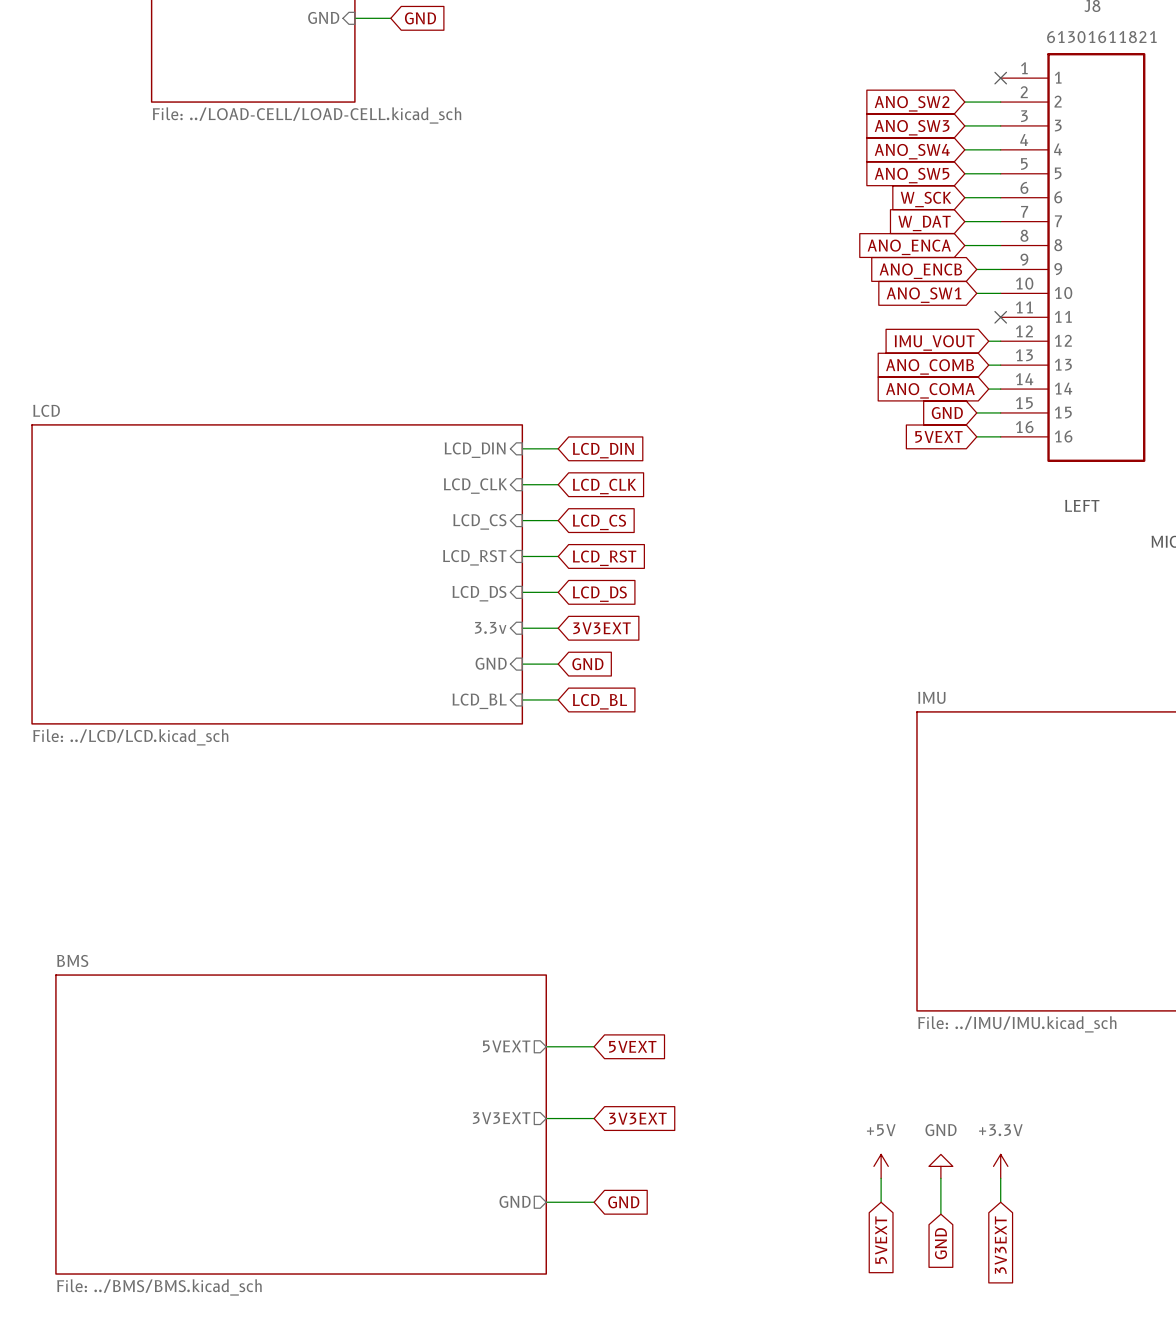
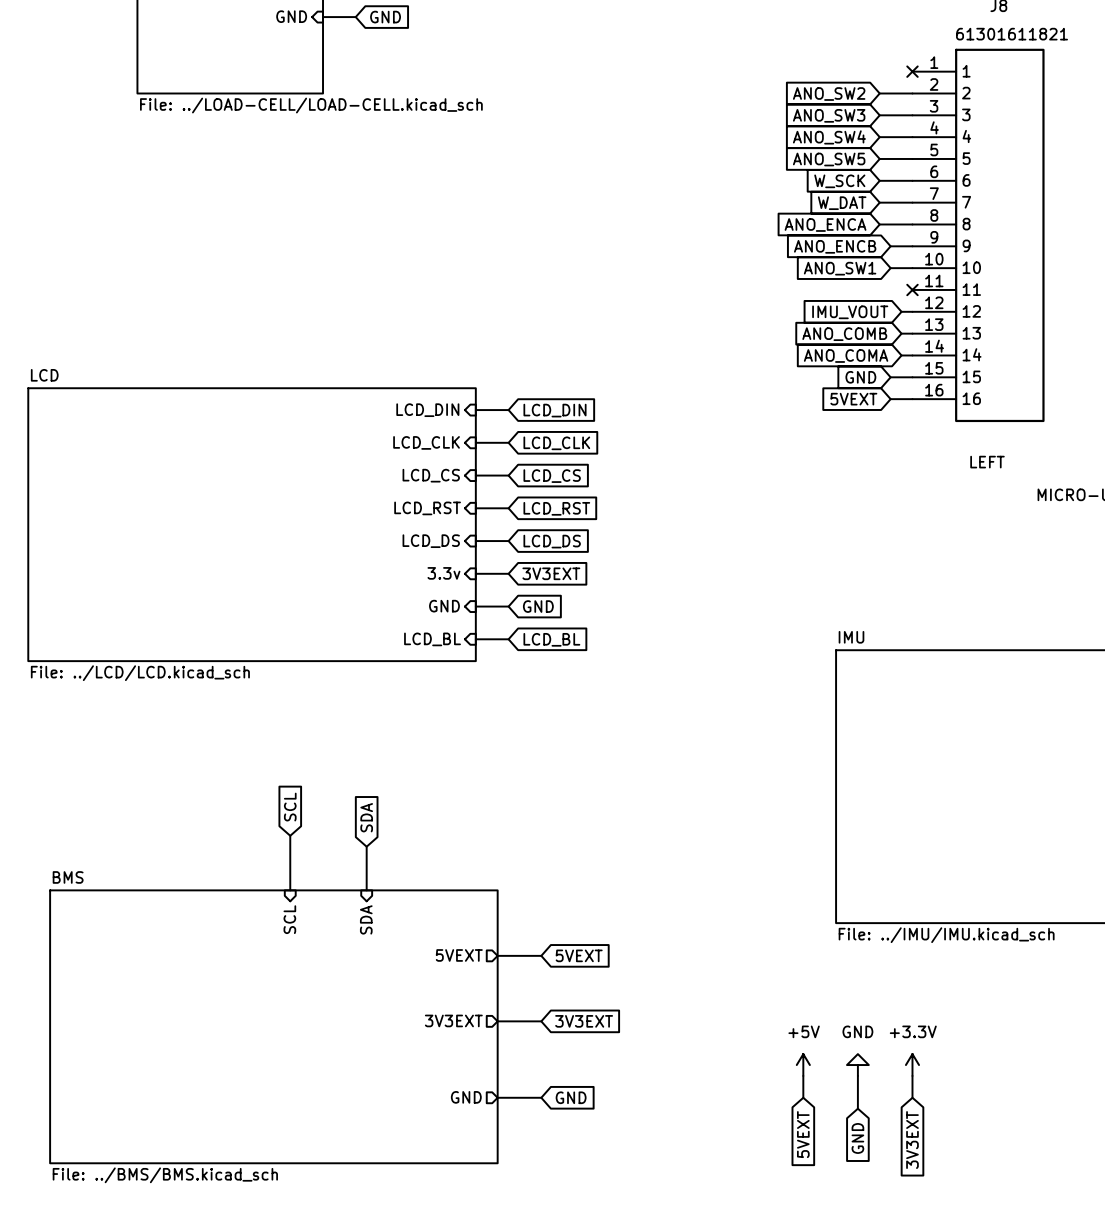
global label: none -> SCL (290, 807)
global label: none -> SDA (366, 817)
wire: none -> (290, 835) (290, 890)
wire: none -> (366, 846) (366, 890)
sheet pin: none -> SCL (289, 919)
sheet pin: none -> SDA (366, 919)

